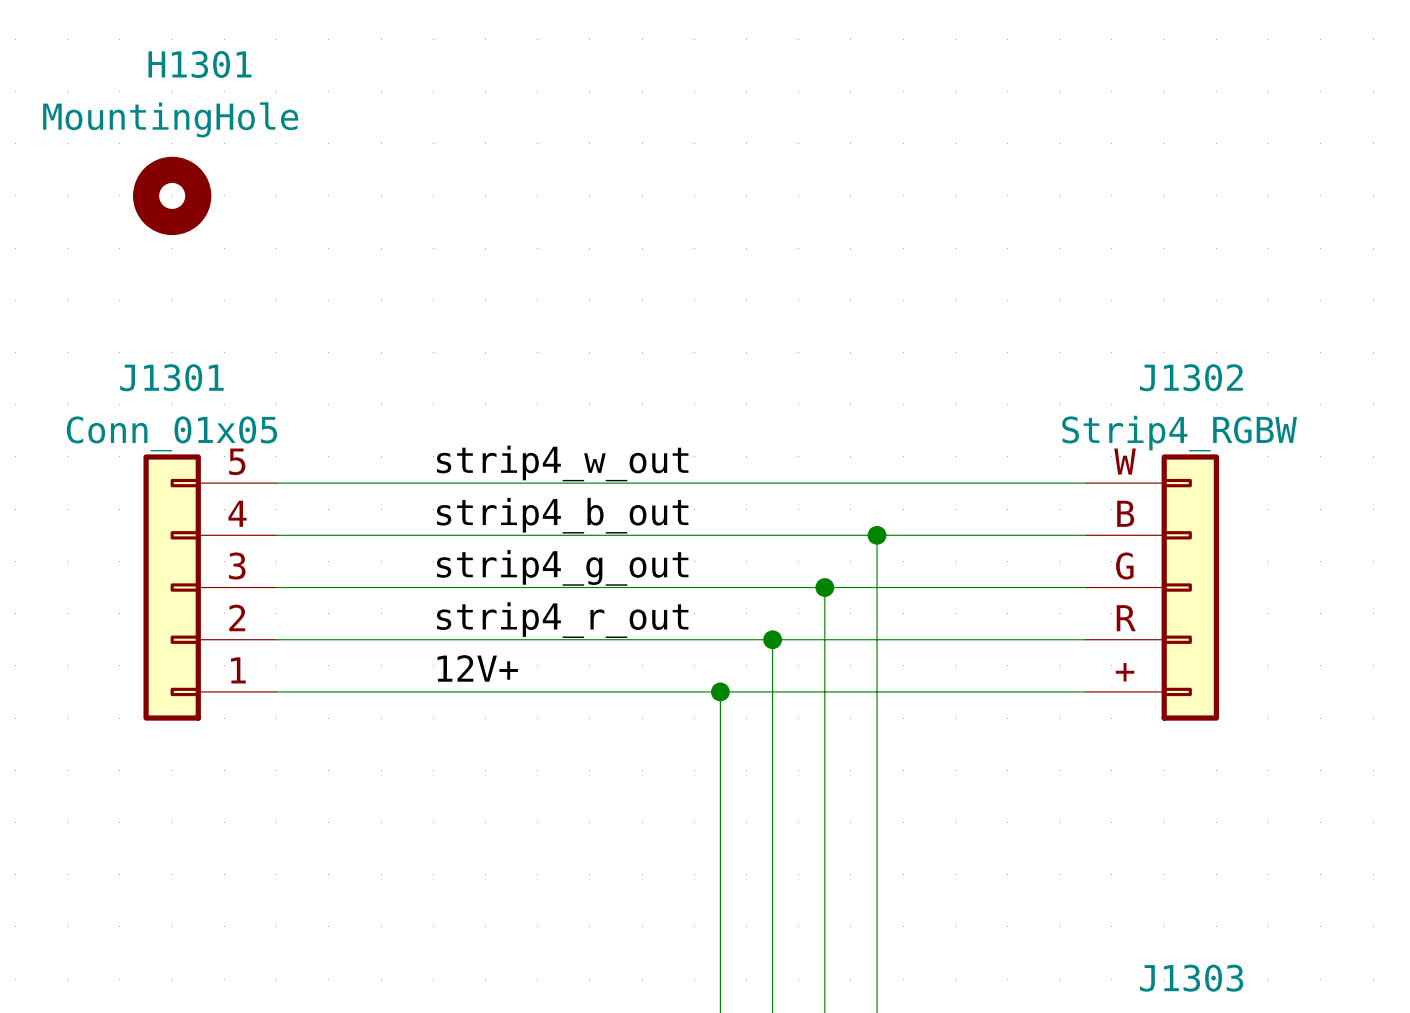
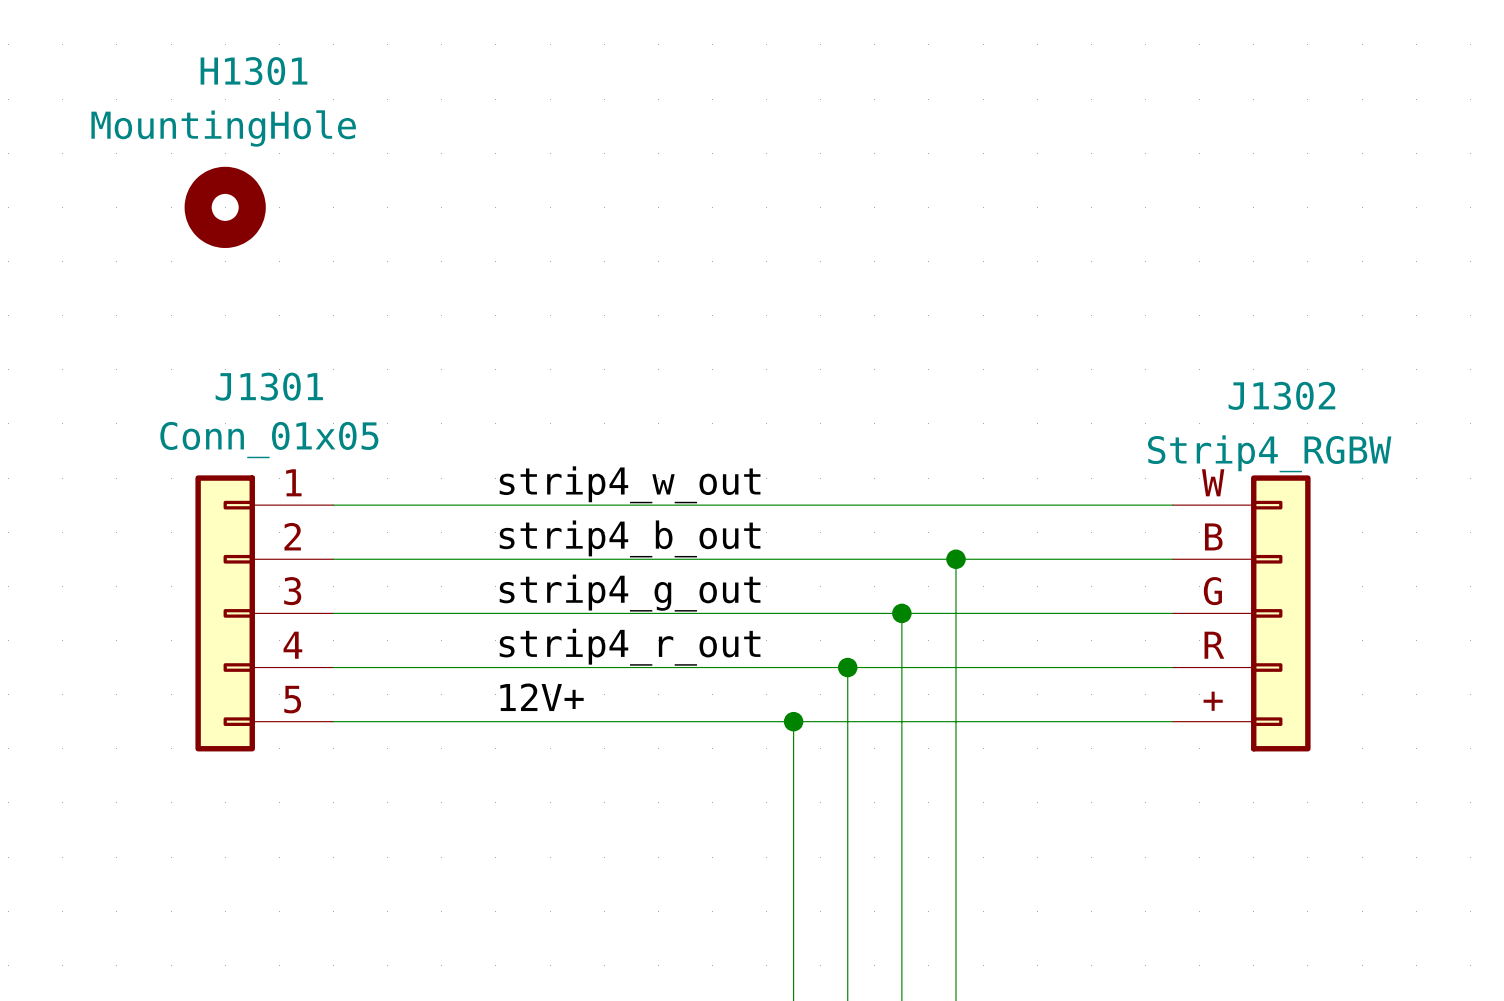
J1301 name position: J1301 (171, 377) -> J1301 (269, 386)
J1301 value position: Conn_01x05 (171, 433) -> Conn_01x05 (269, 440)
J1301 flip: as is (172, 587) -> up-down (225, 613)

